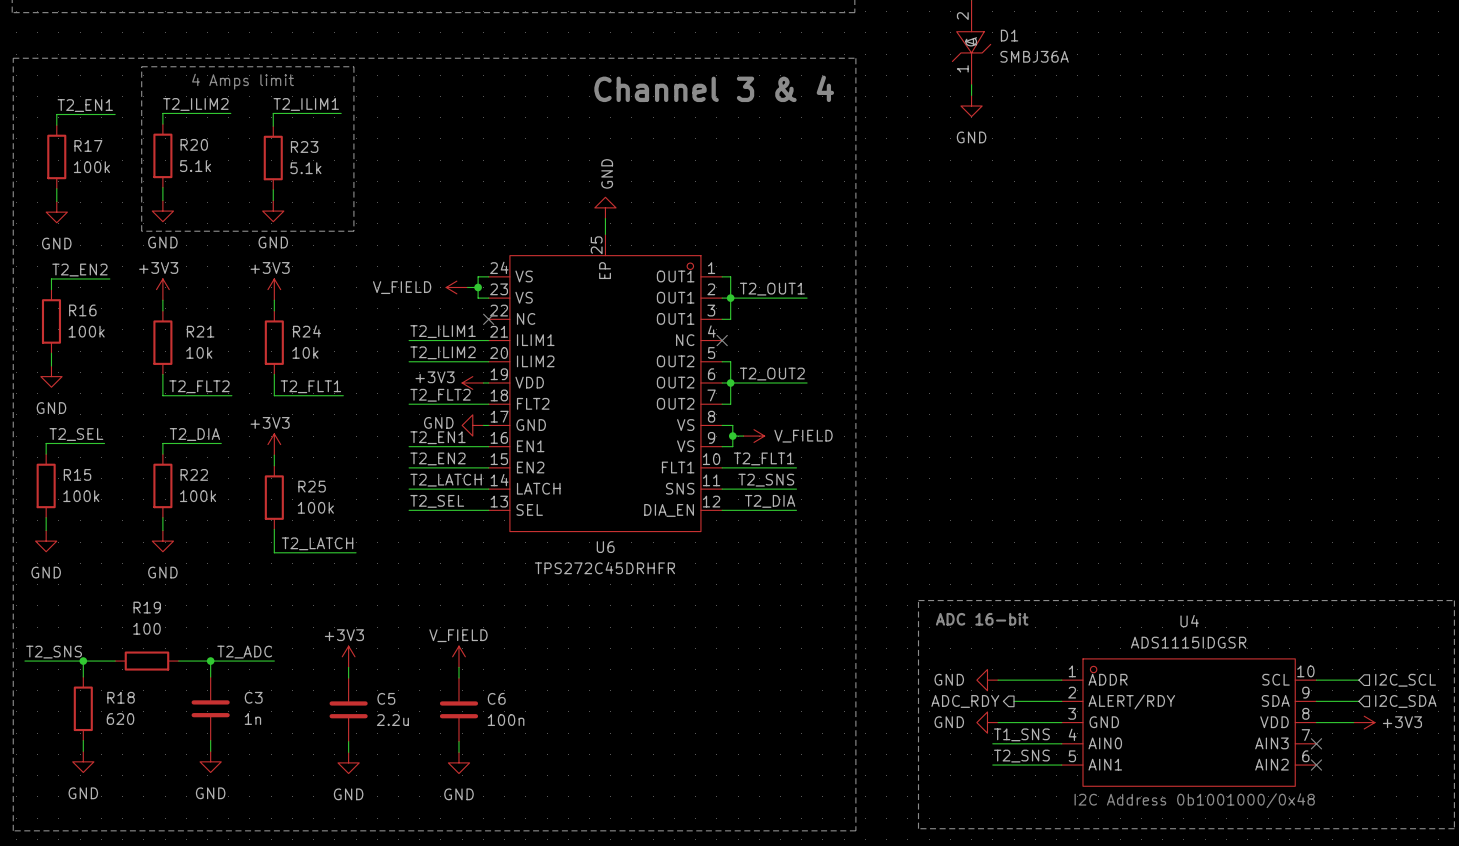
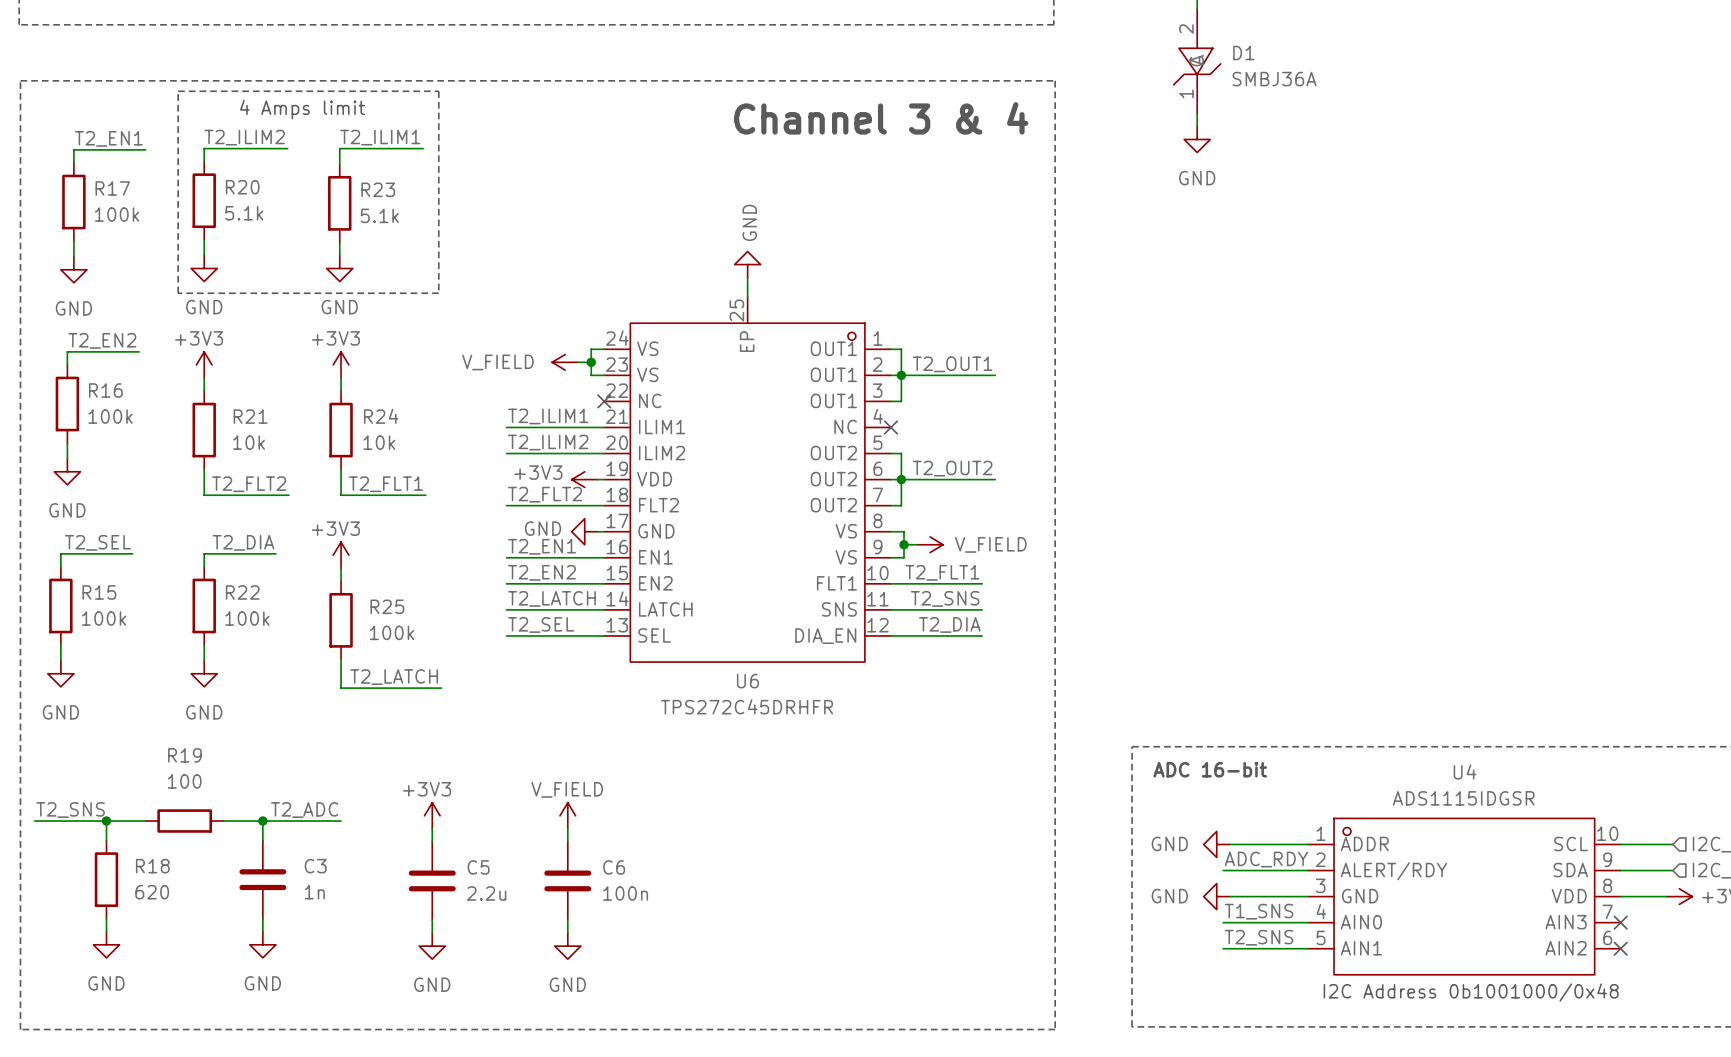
label: none -> ADC_RDY (1266, 859)
hierarchical label: ADC_RDY (965, 701) -> none
wire: none -> (1223, 870) (1249, 870)

